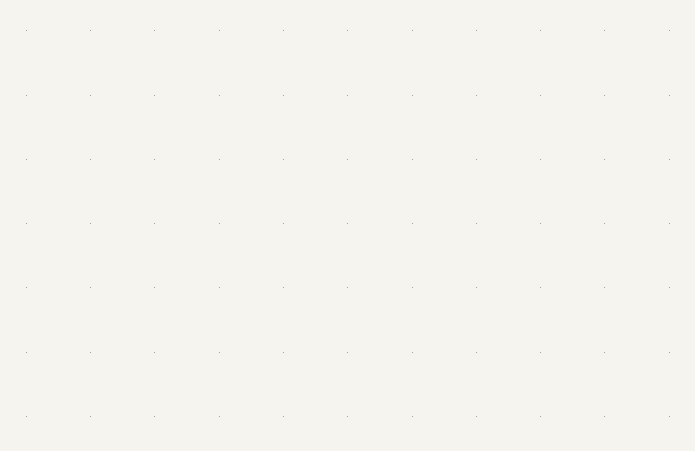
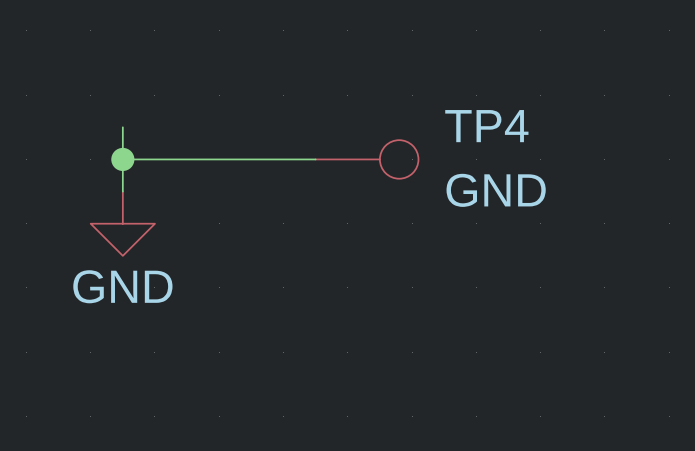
wire: none -> (122, 127) (122, 191)
wire: none -> (122, 159) (315, 159)
junction: none -> (122, 159)
TP4: none -> GND (367, 159)
power symbol: none -> GND (122, 223)

